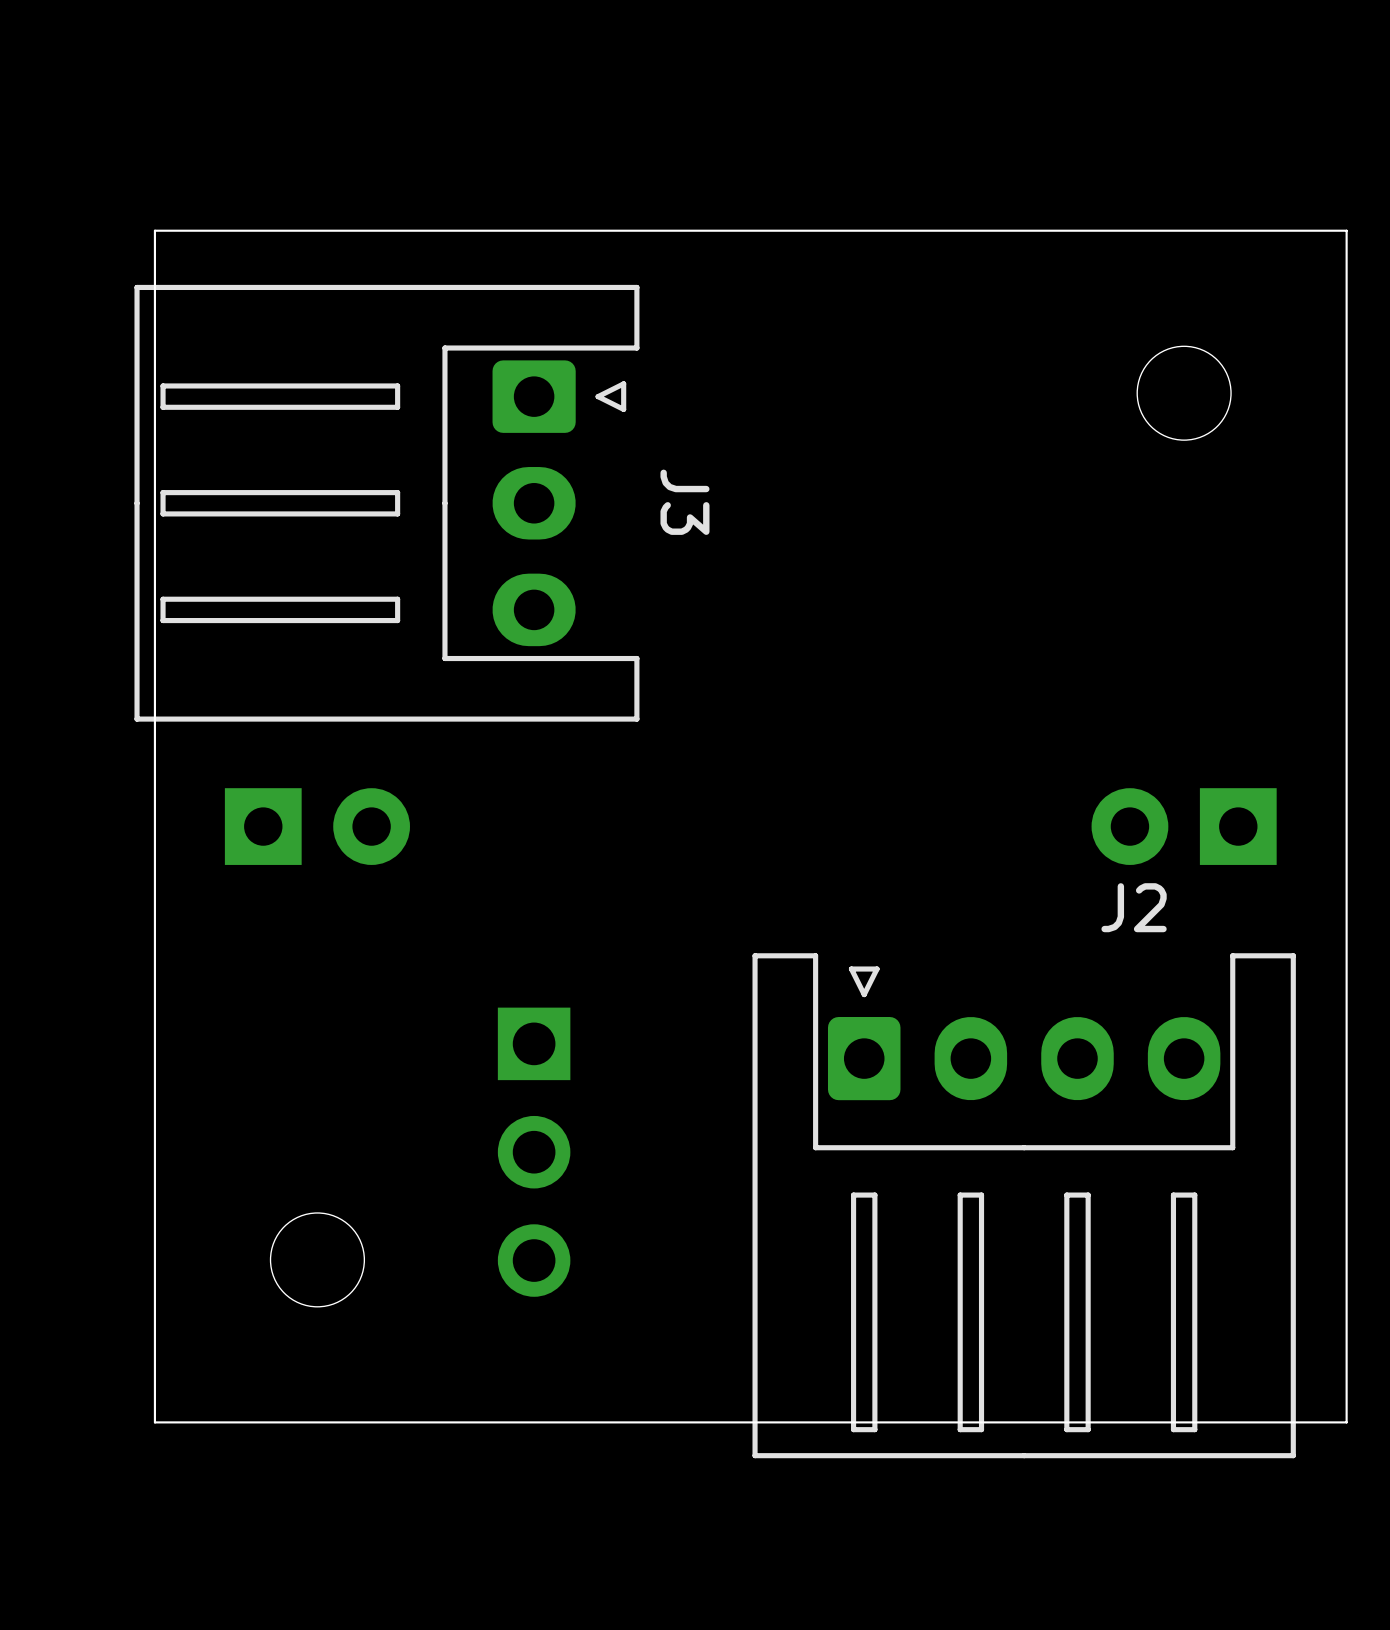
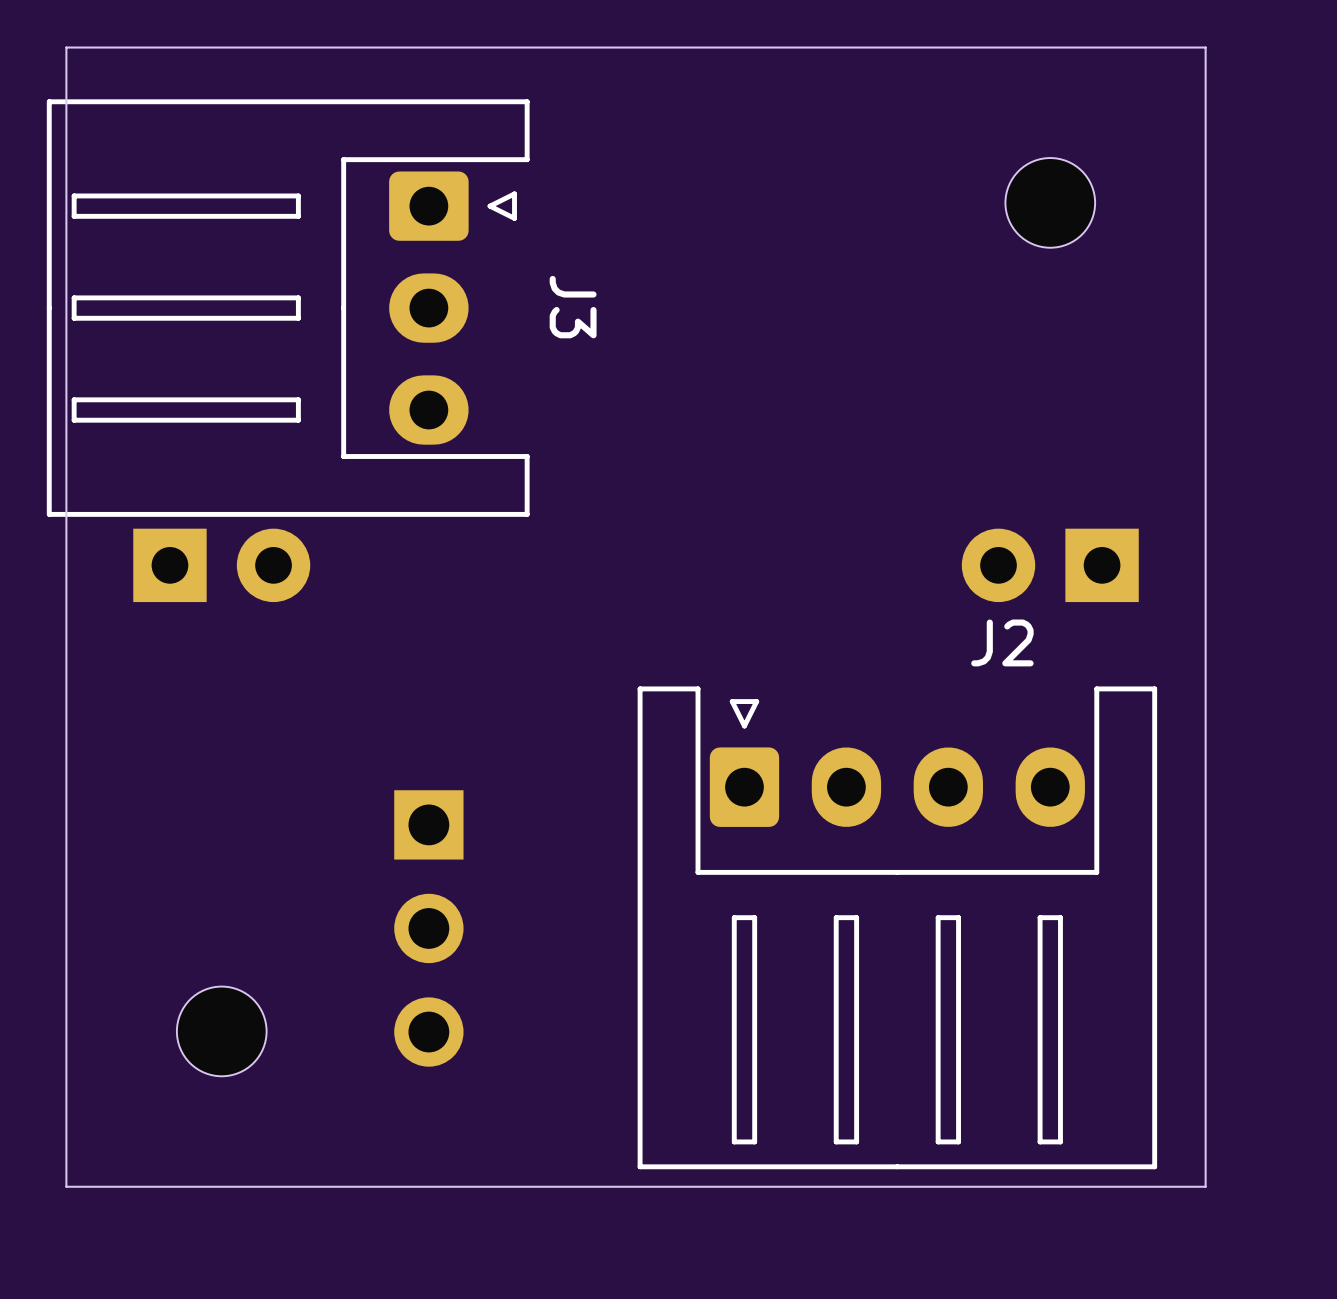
part position: (317, 826) -> (221, 565)
part position: (1184, 826) -> (1050, 565)
J2 position: (1024, 1205) -> (897, 927)

